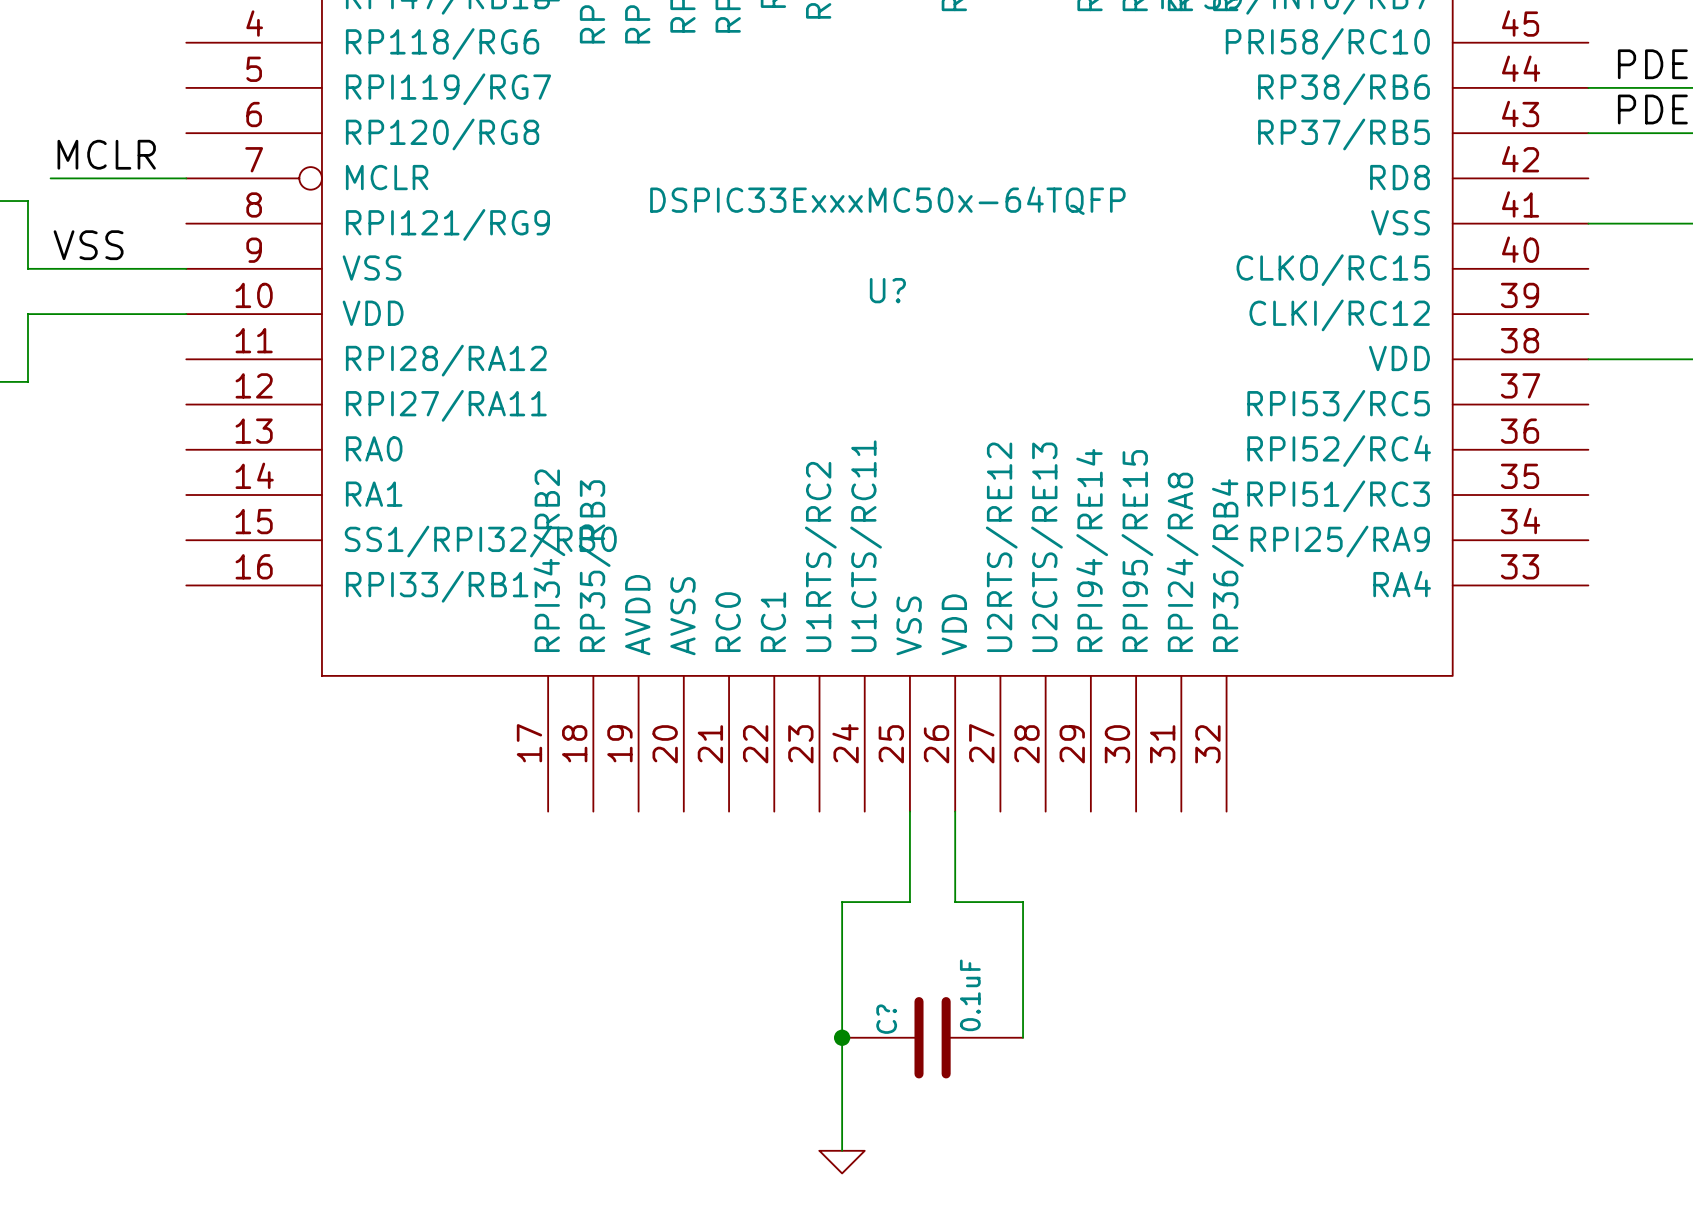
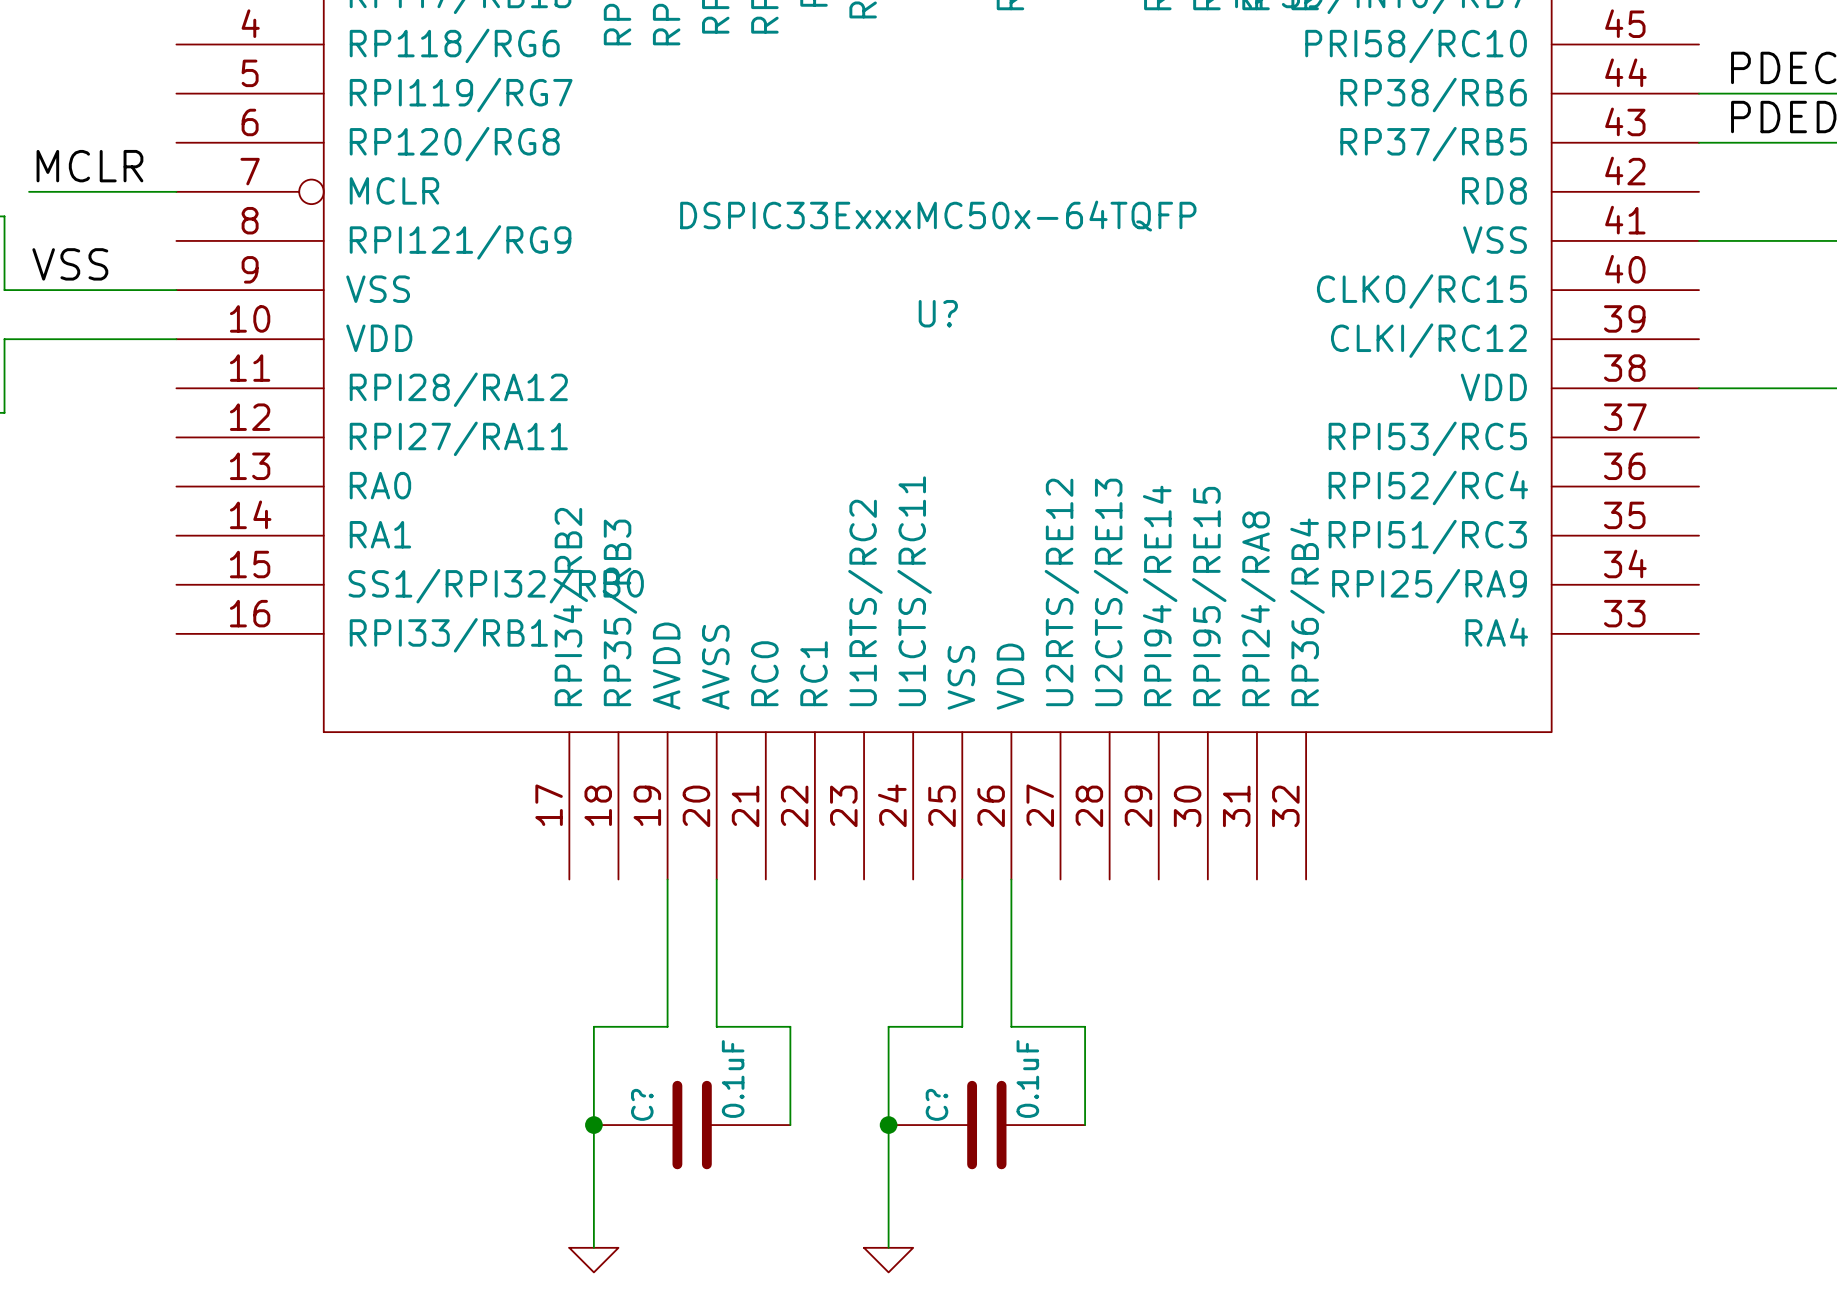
wire: none -> (667, 879) (667, 1026) (593, 1026) (593, 1247)
wire: none -> (716, 879) (716, 1026) (790, 1026) (790, 1125)
wire: (909, 902) (842, 902) (842, 947) -> (962, 977) (962, 1026) (888, 1026)
wire: (955, 902) (1023, 902) (1023, 947) -> (1011, 977) (1011, 1026) (1085, 1026)
junction: none -> (593, 1125)
C?: none -> 0.1uF (692, 1125)
power symbol: none -> (593, 1260)

